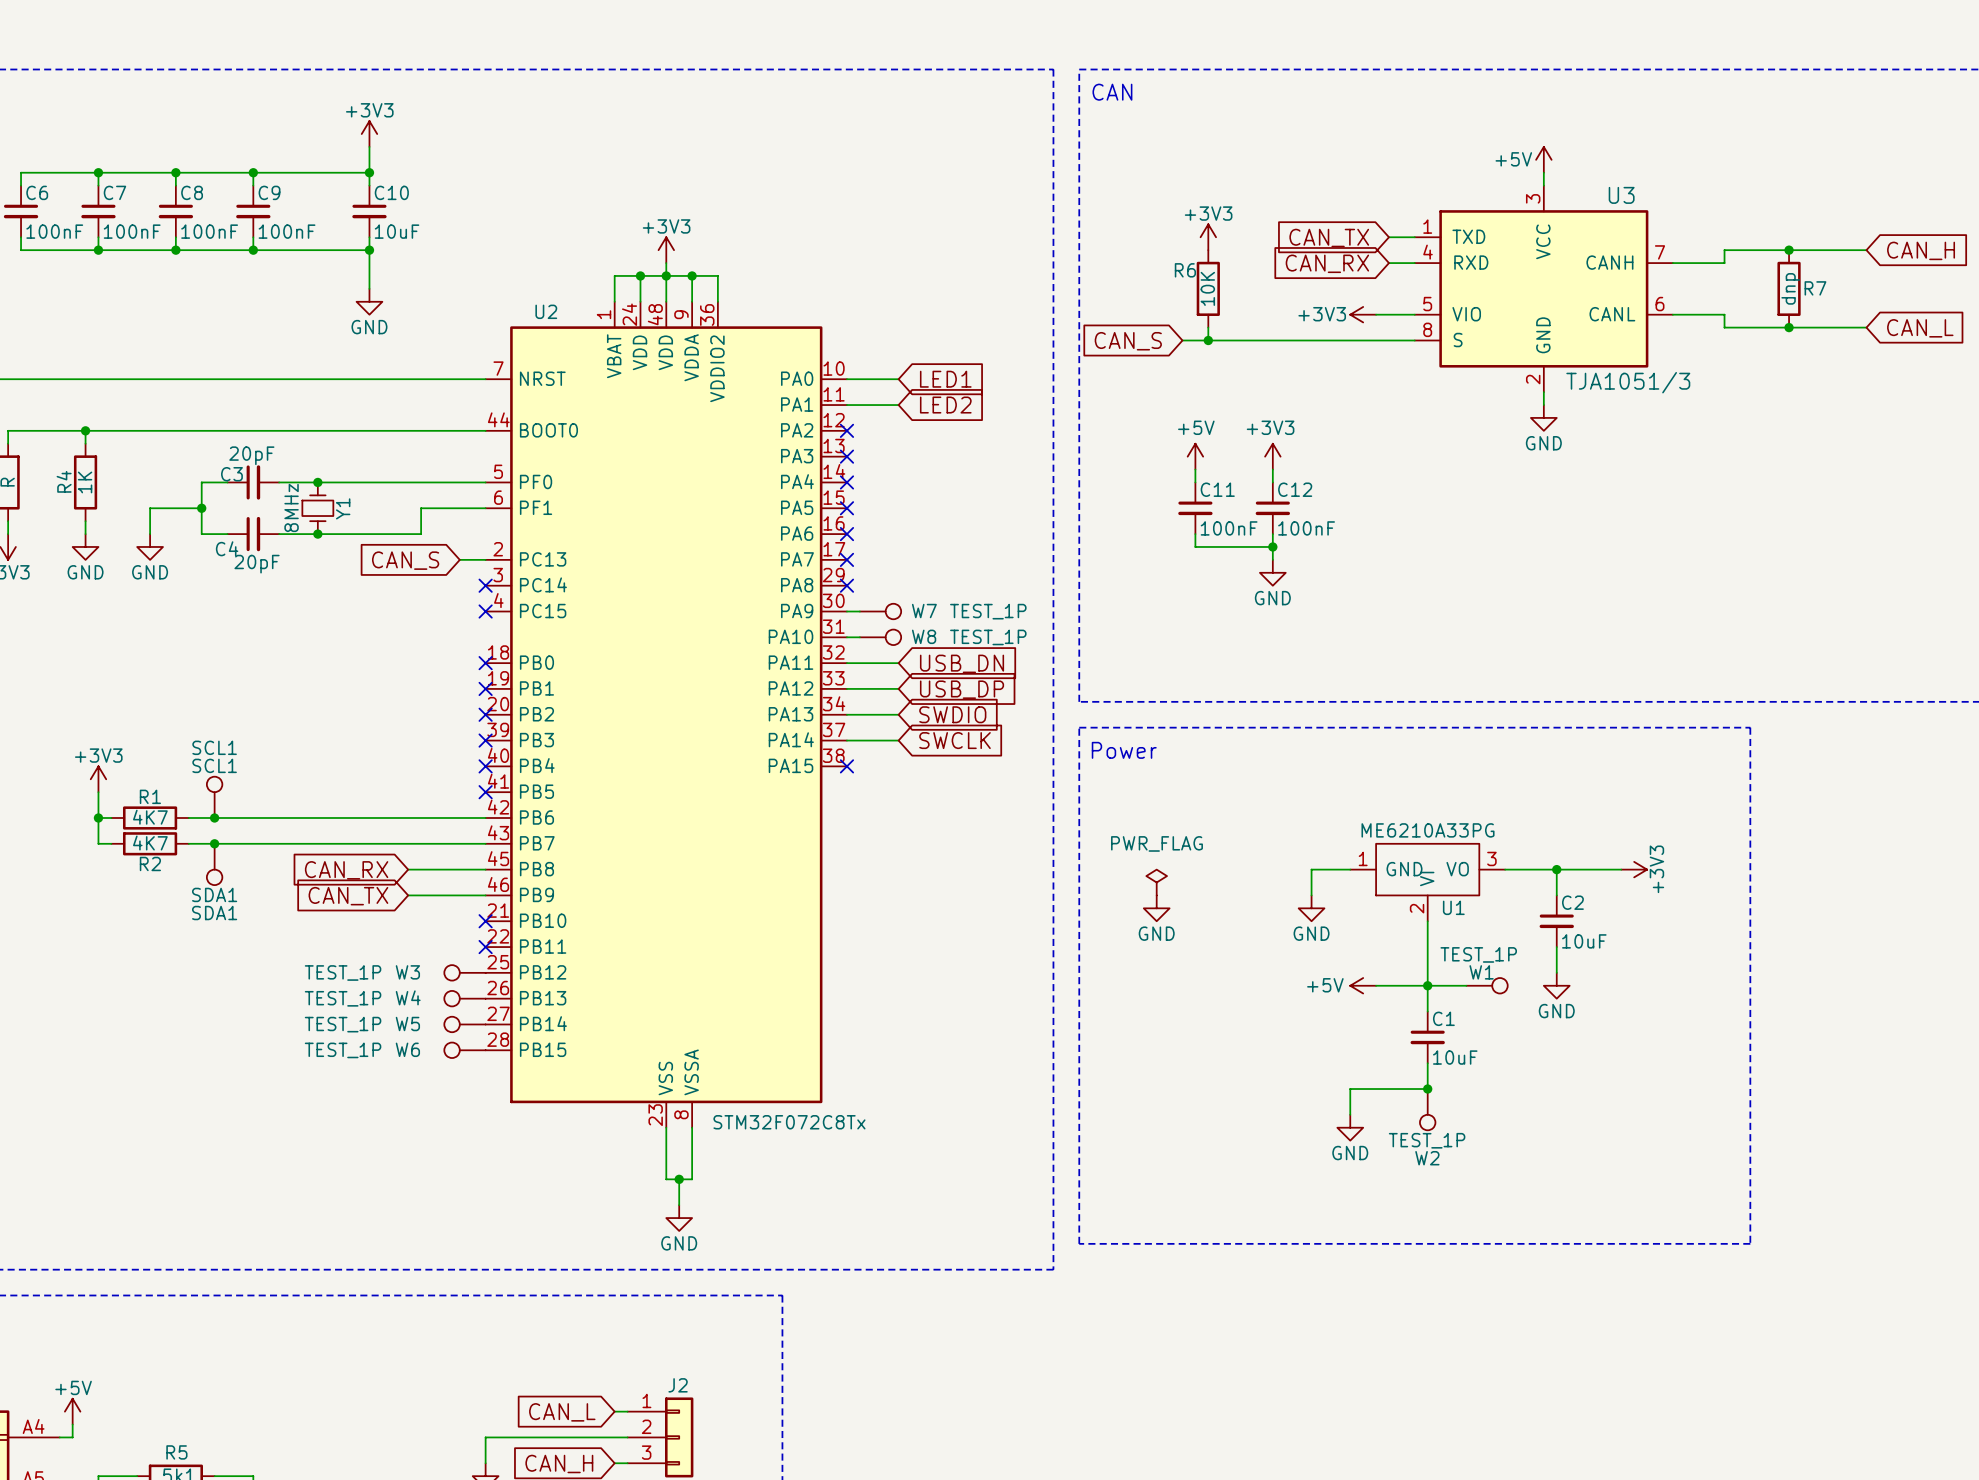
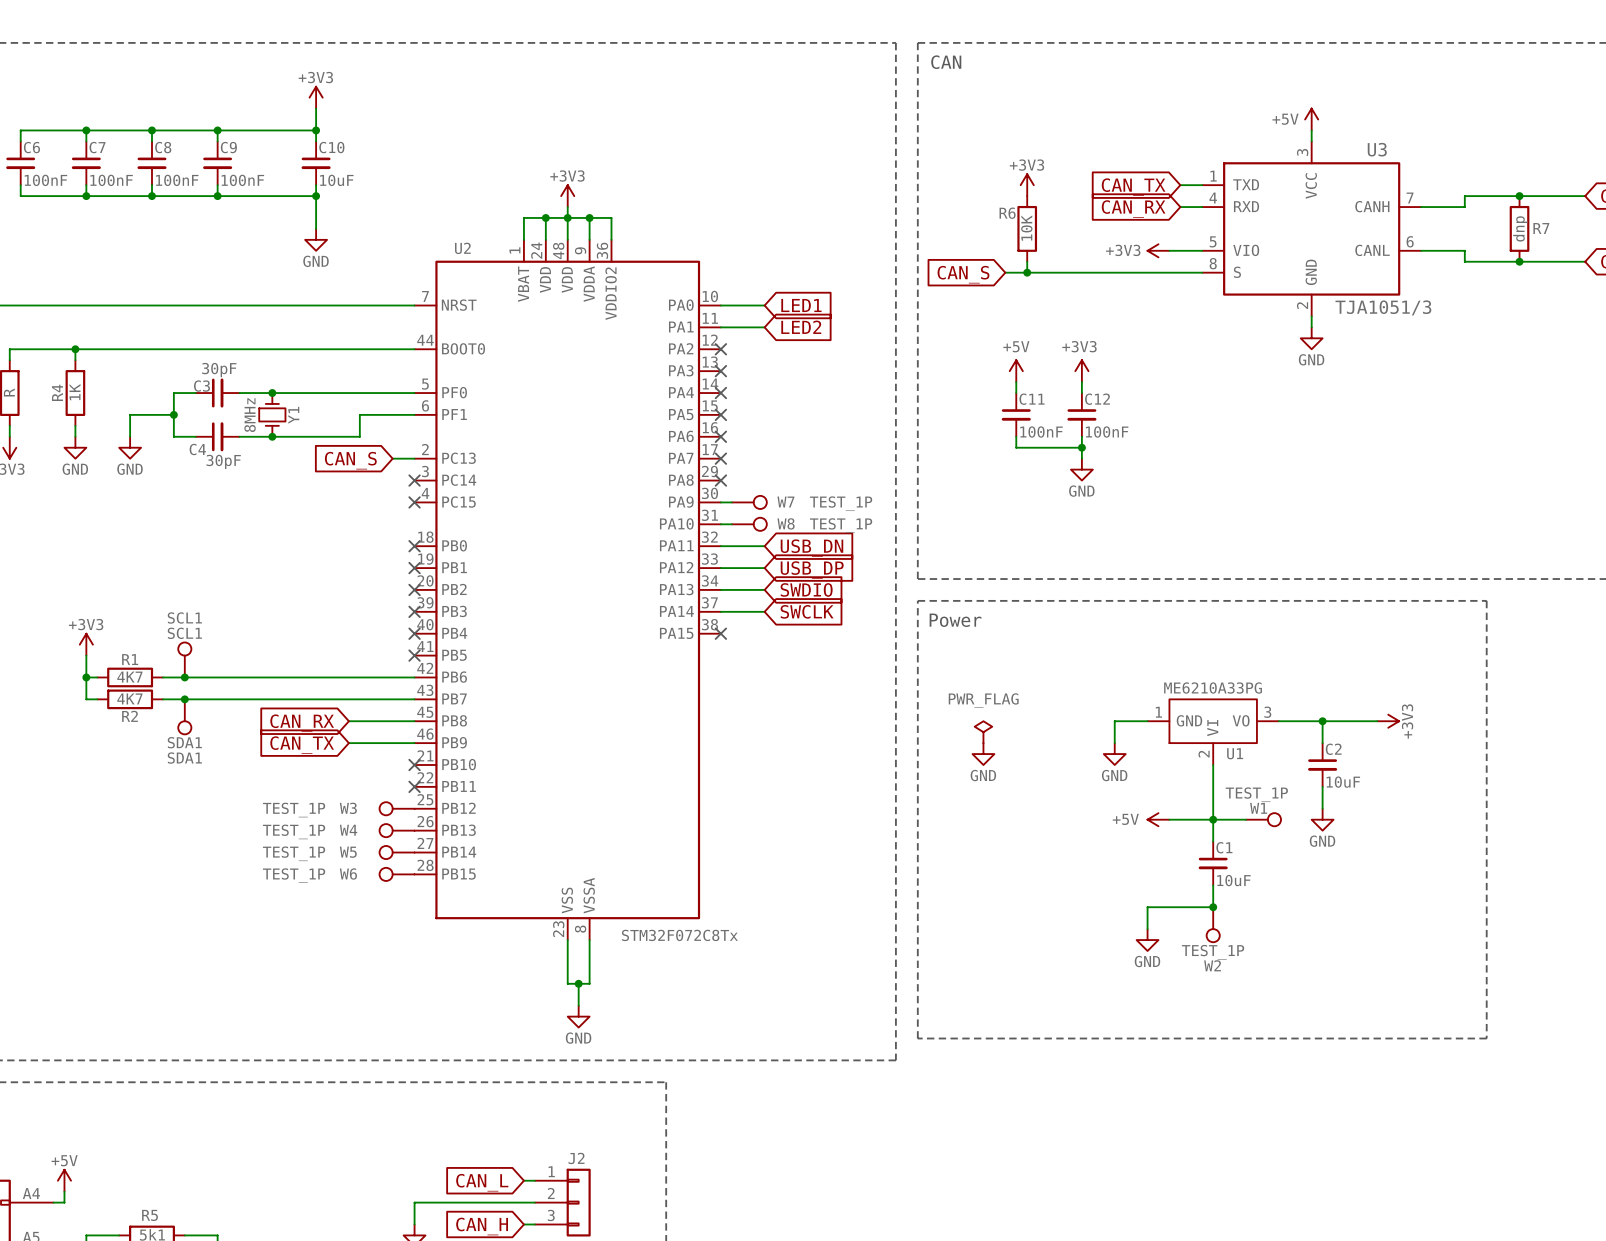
C3 value: 20pF (251, 455) -> 30pF (219, 370)
C4 value: 20pF (257, 564) -> 30pF (223, 461)

